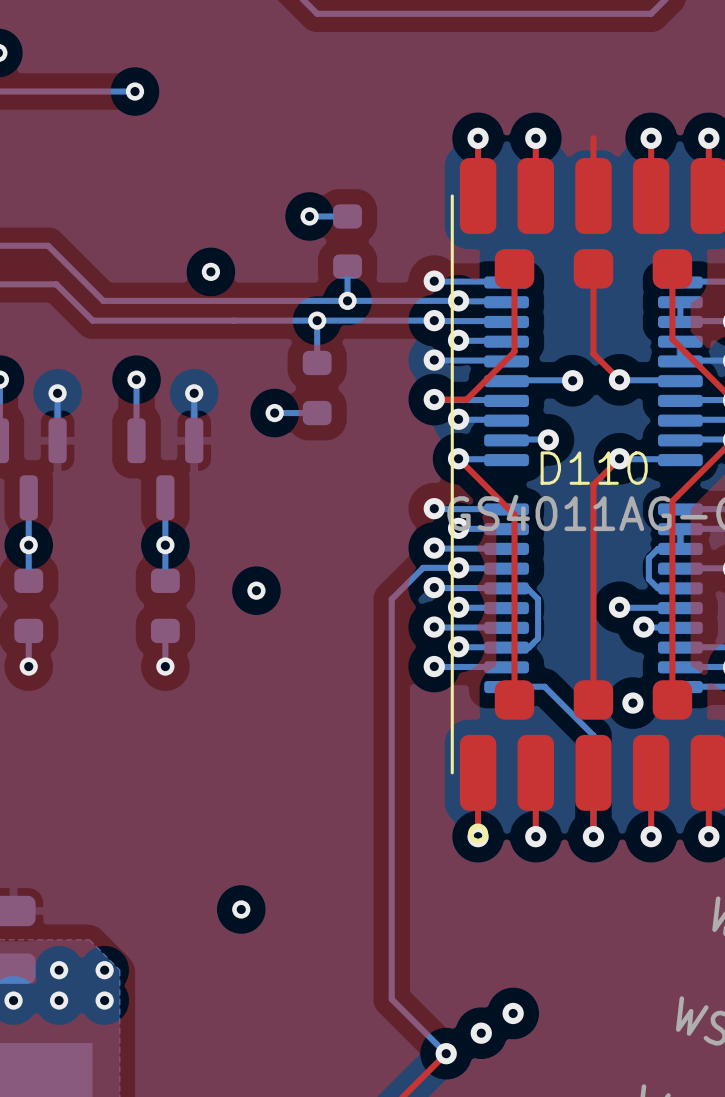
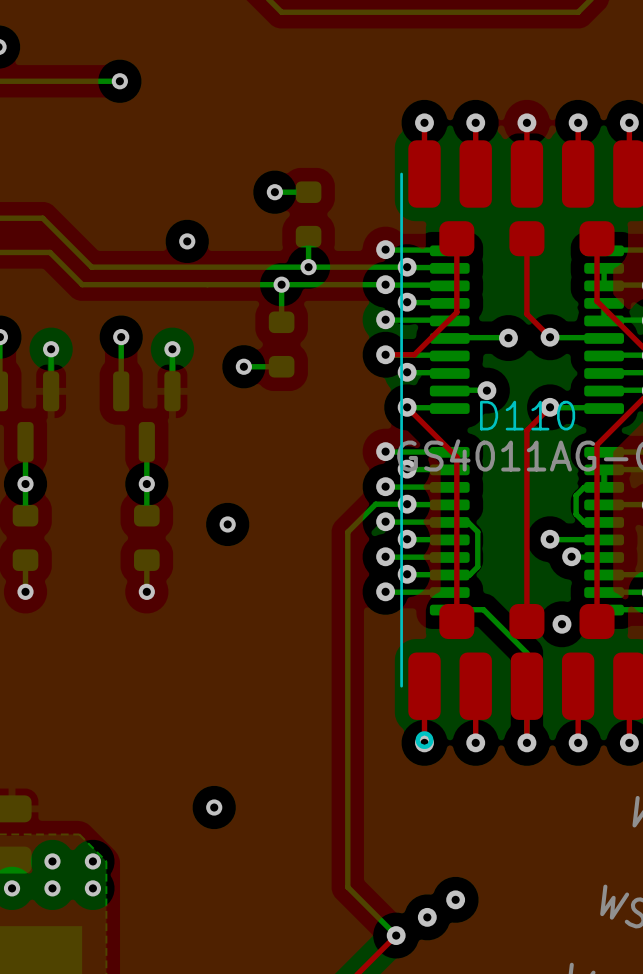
via: none -> (526, 122)

